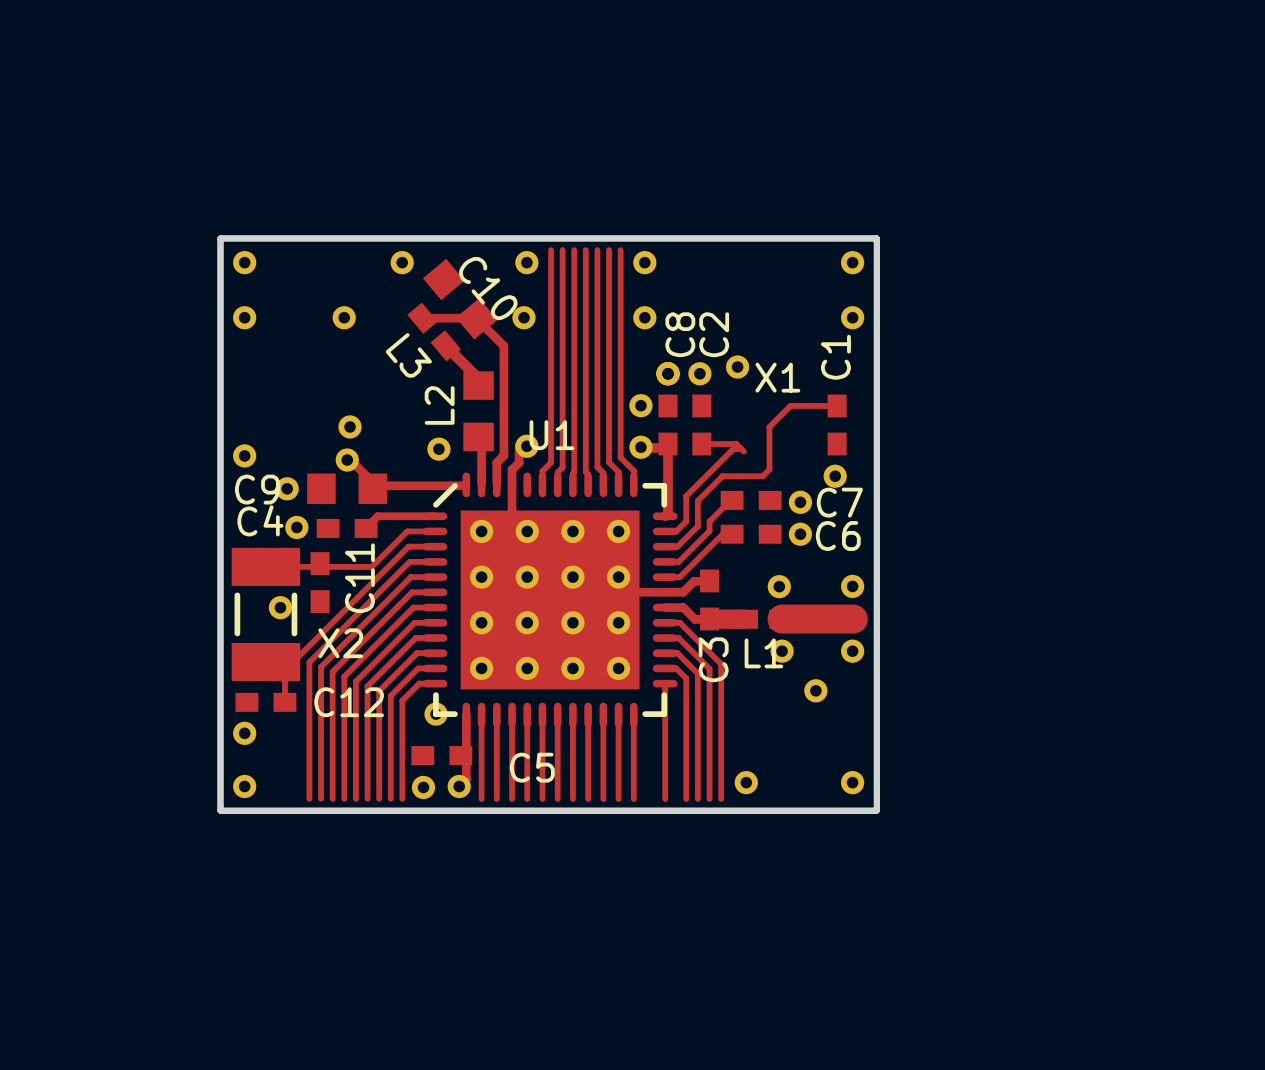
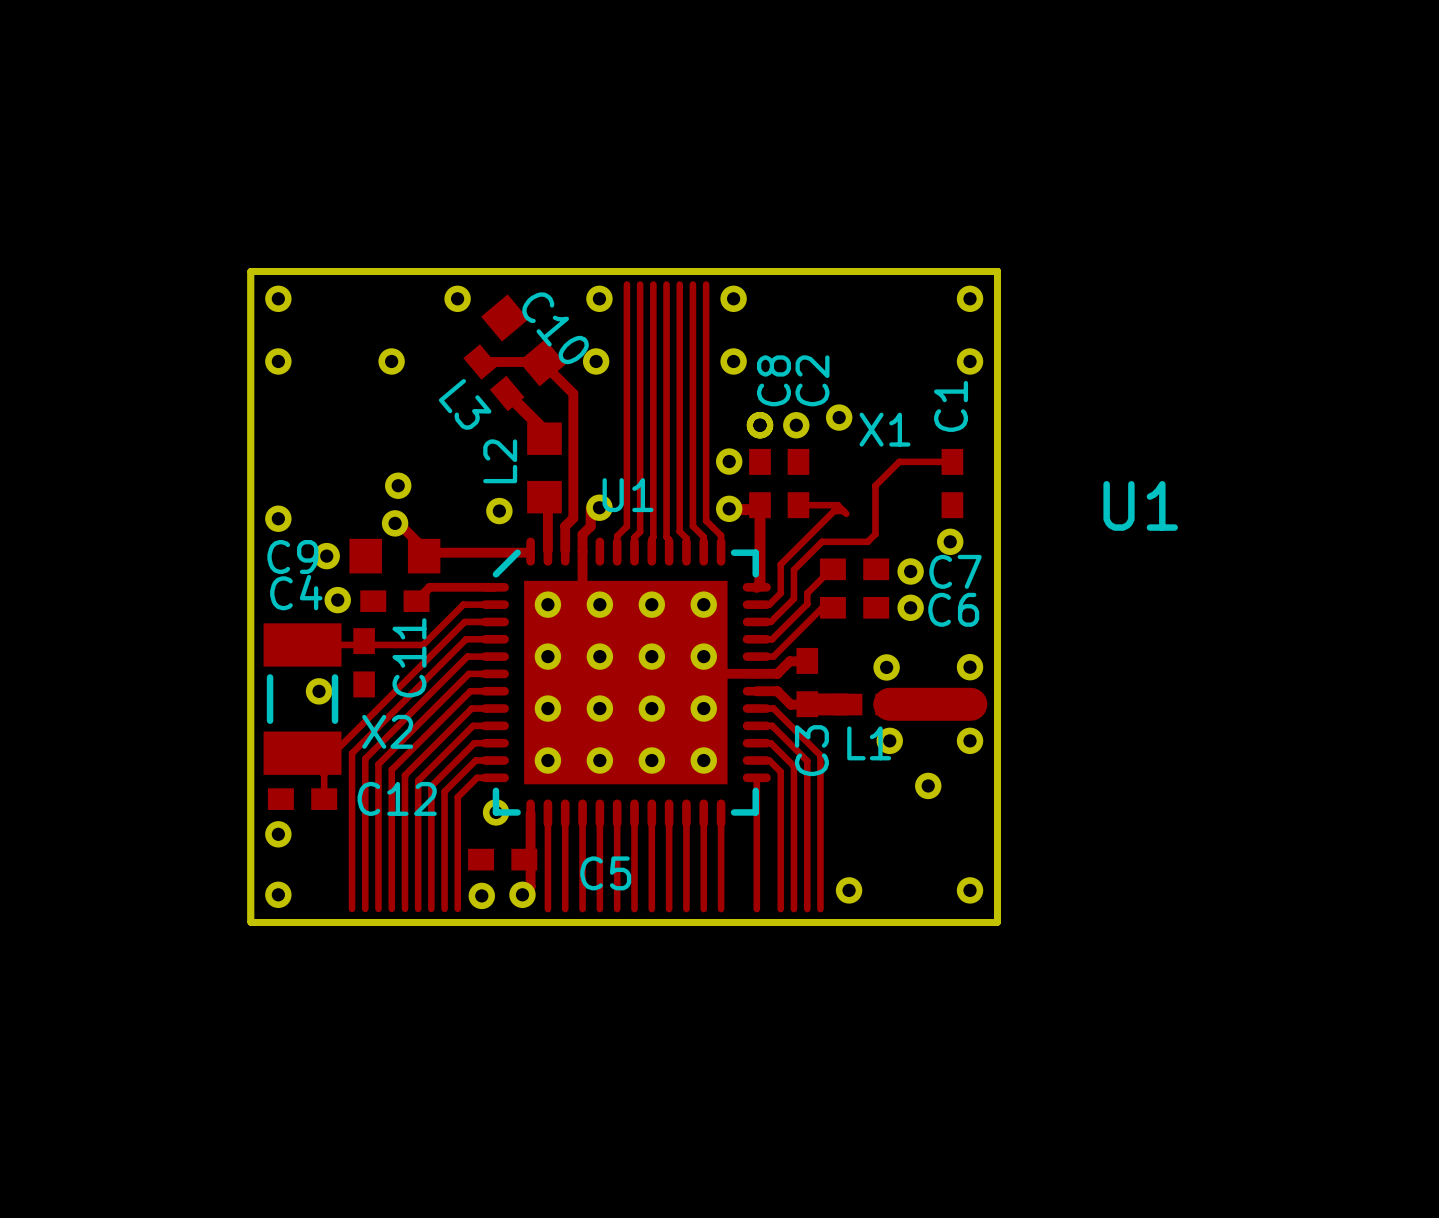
U1 name: none -> U1 (1140, 505)

